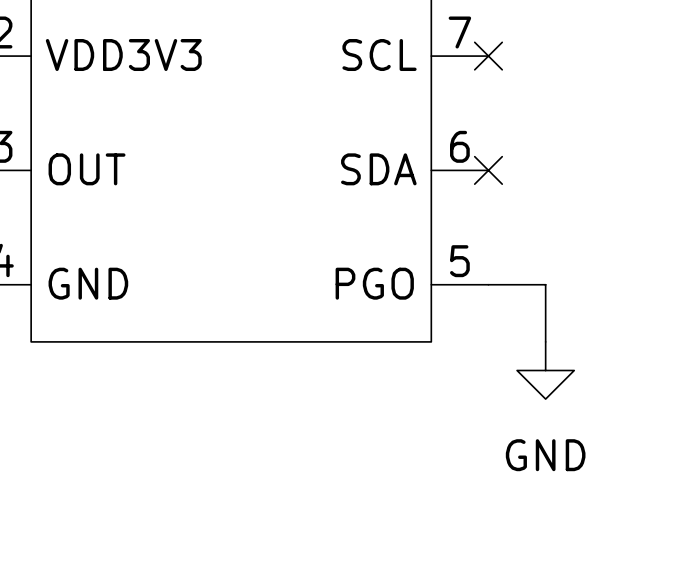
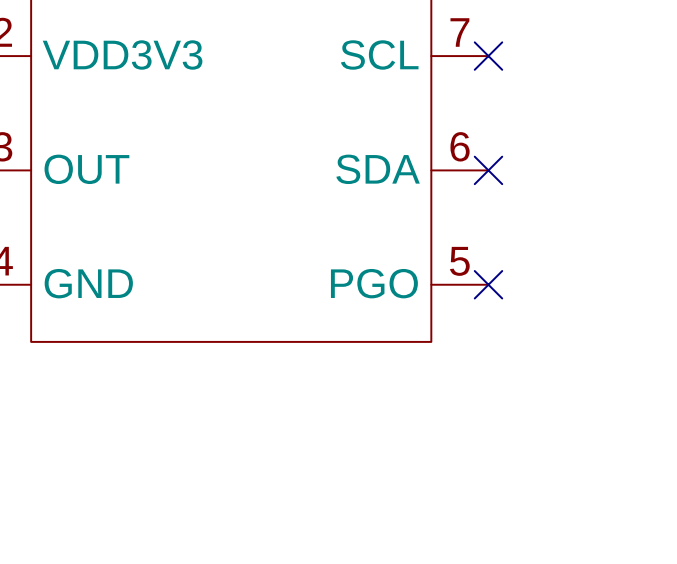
wire: (488, 284) (545, 284) (545, 341) -> none
no-connect mark: none -> (488, 284)
power symbol: GND (545, 370) -> none

